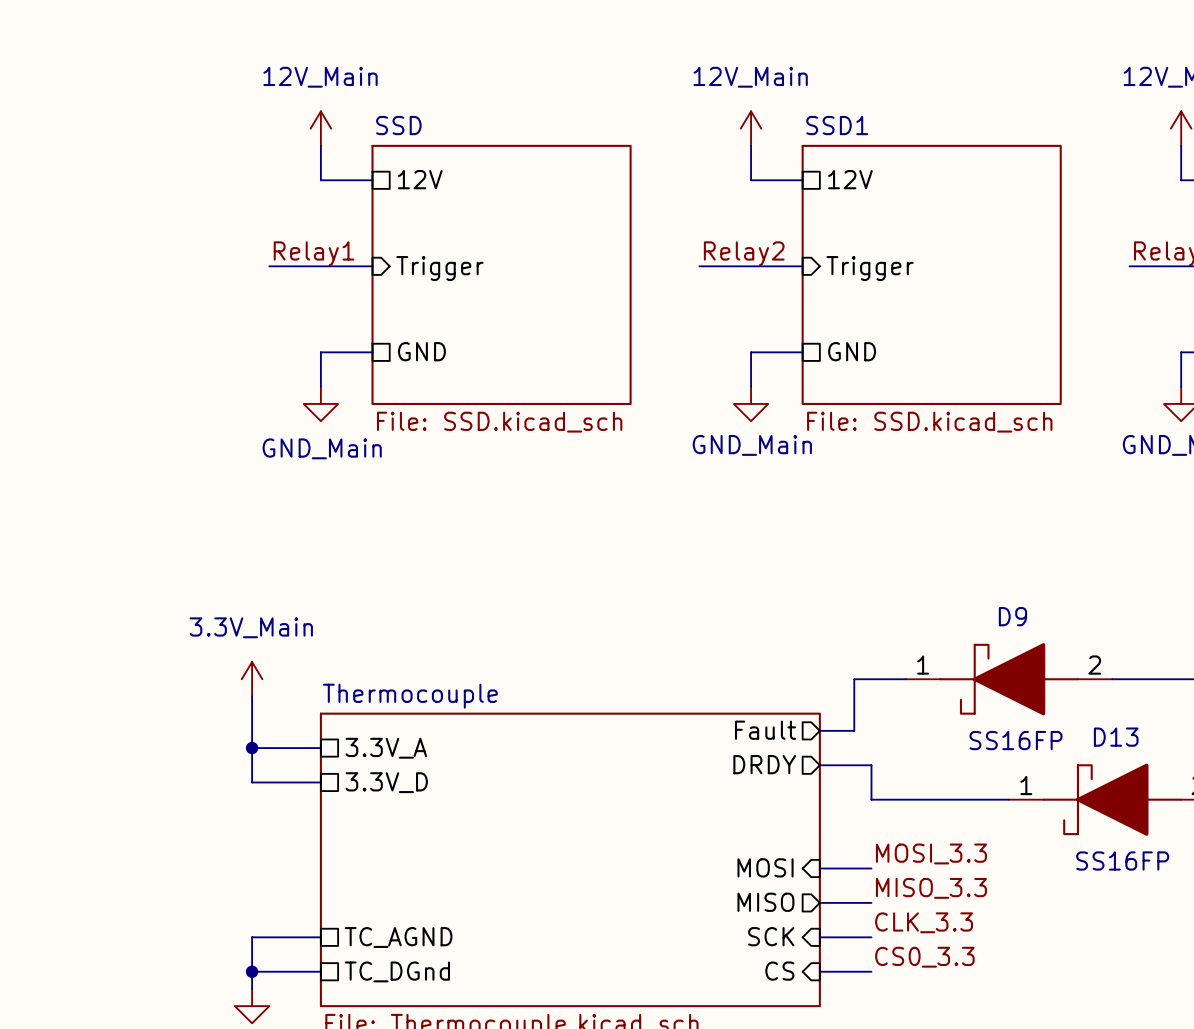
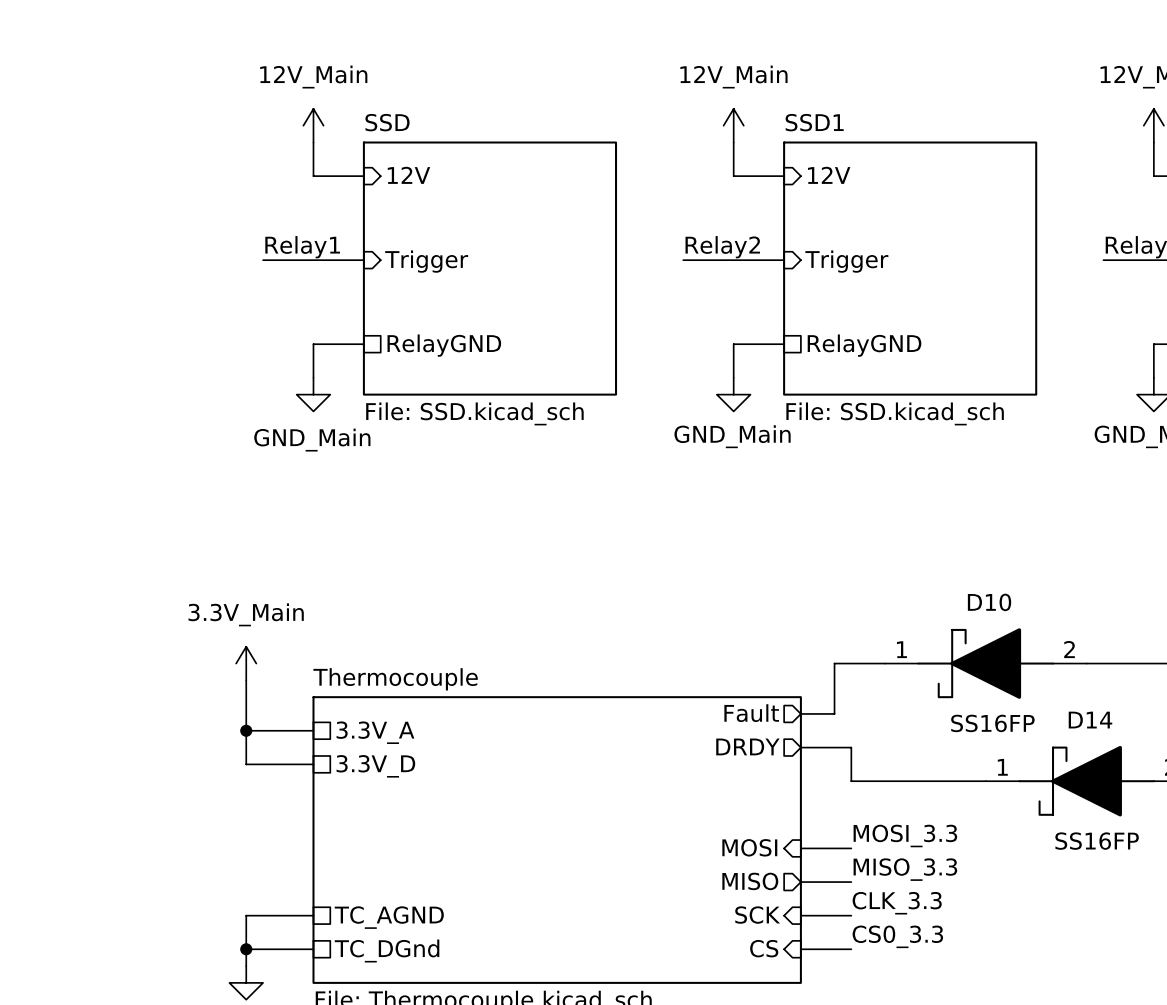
sheet pin shape: passive (420, 179) -> input (408, 175)
sheet pin shape: passive (850, 179) -> input (829, 175)
sheet pin: GND (421, 351) -> RelayGND (444, 345)
sheet pin: GND (852, 351) -> RelayGND (864, 345)
D9 name: D9 (1012, 616) -> D10 (989, 602)
D13 name: D13 (1116, 737) -> D14 (1090, 720)

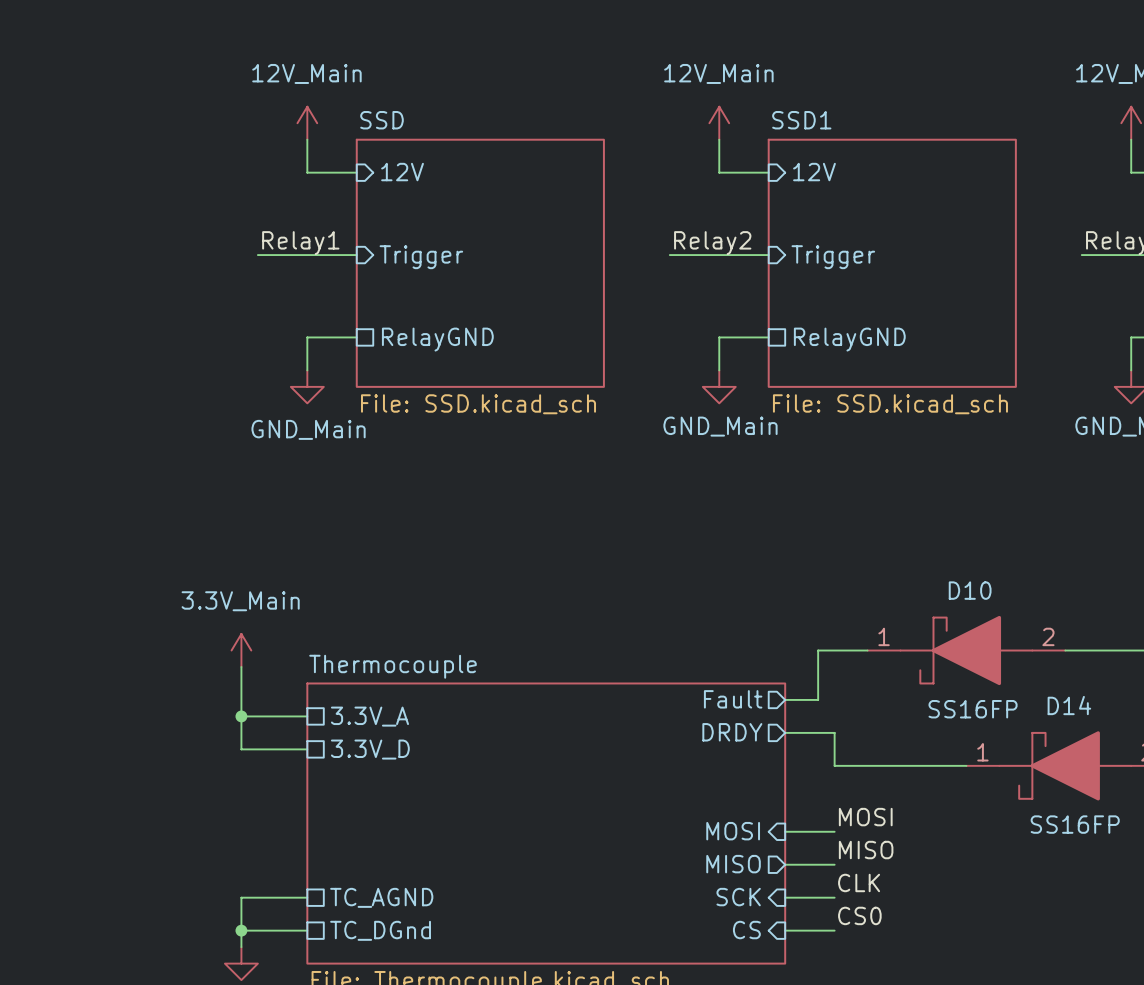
label: MOSI_3.3 (905, 836) -> MOSI (865, 817)
label: MISO_3.3 (905, 869) -> MISO (866, 850)
label: CLK_3.3 (897, 903) -> CLK (859, 882)
label: CS0_3.3 (897, 936) -> CS0 (859, 915)

